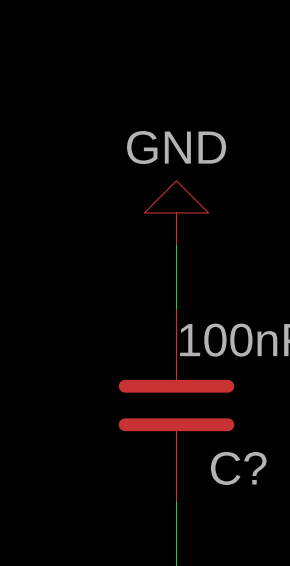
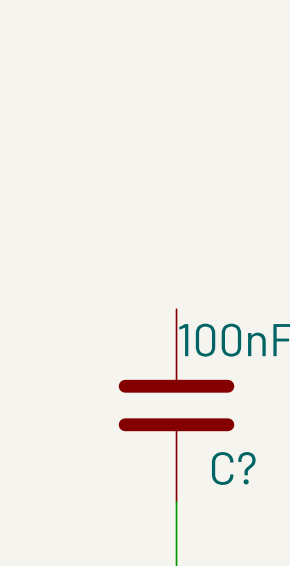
power symbol: GND (176, 212) -> none
wire: (176, 245) (176, 309) -> none

